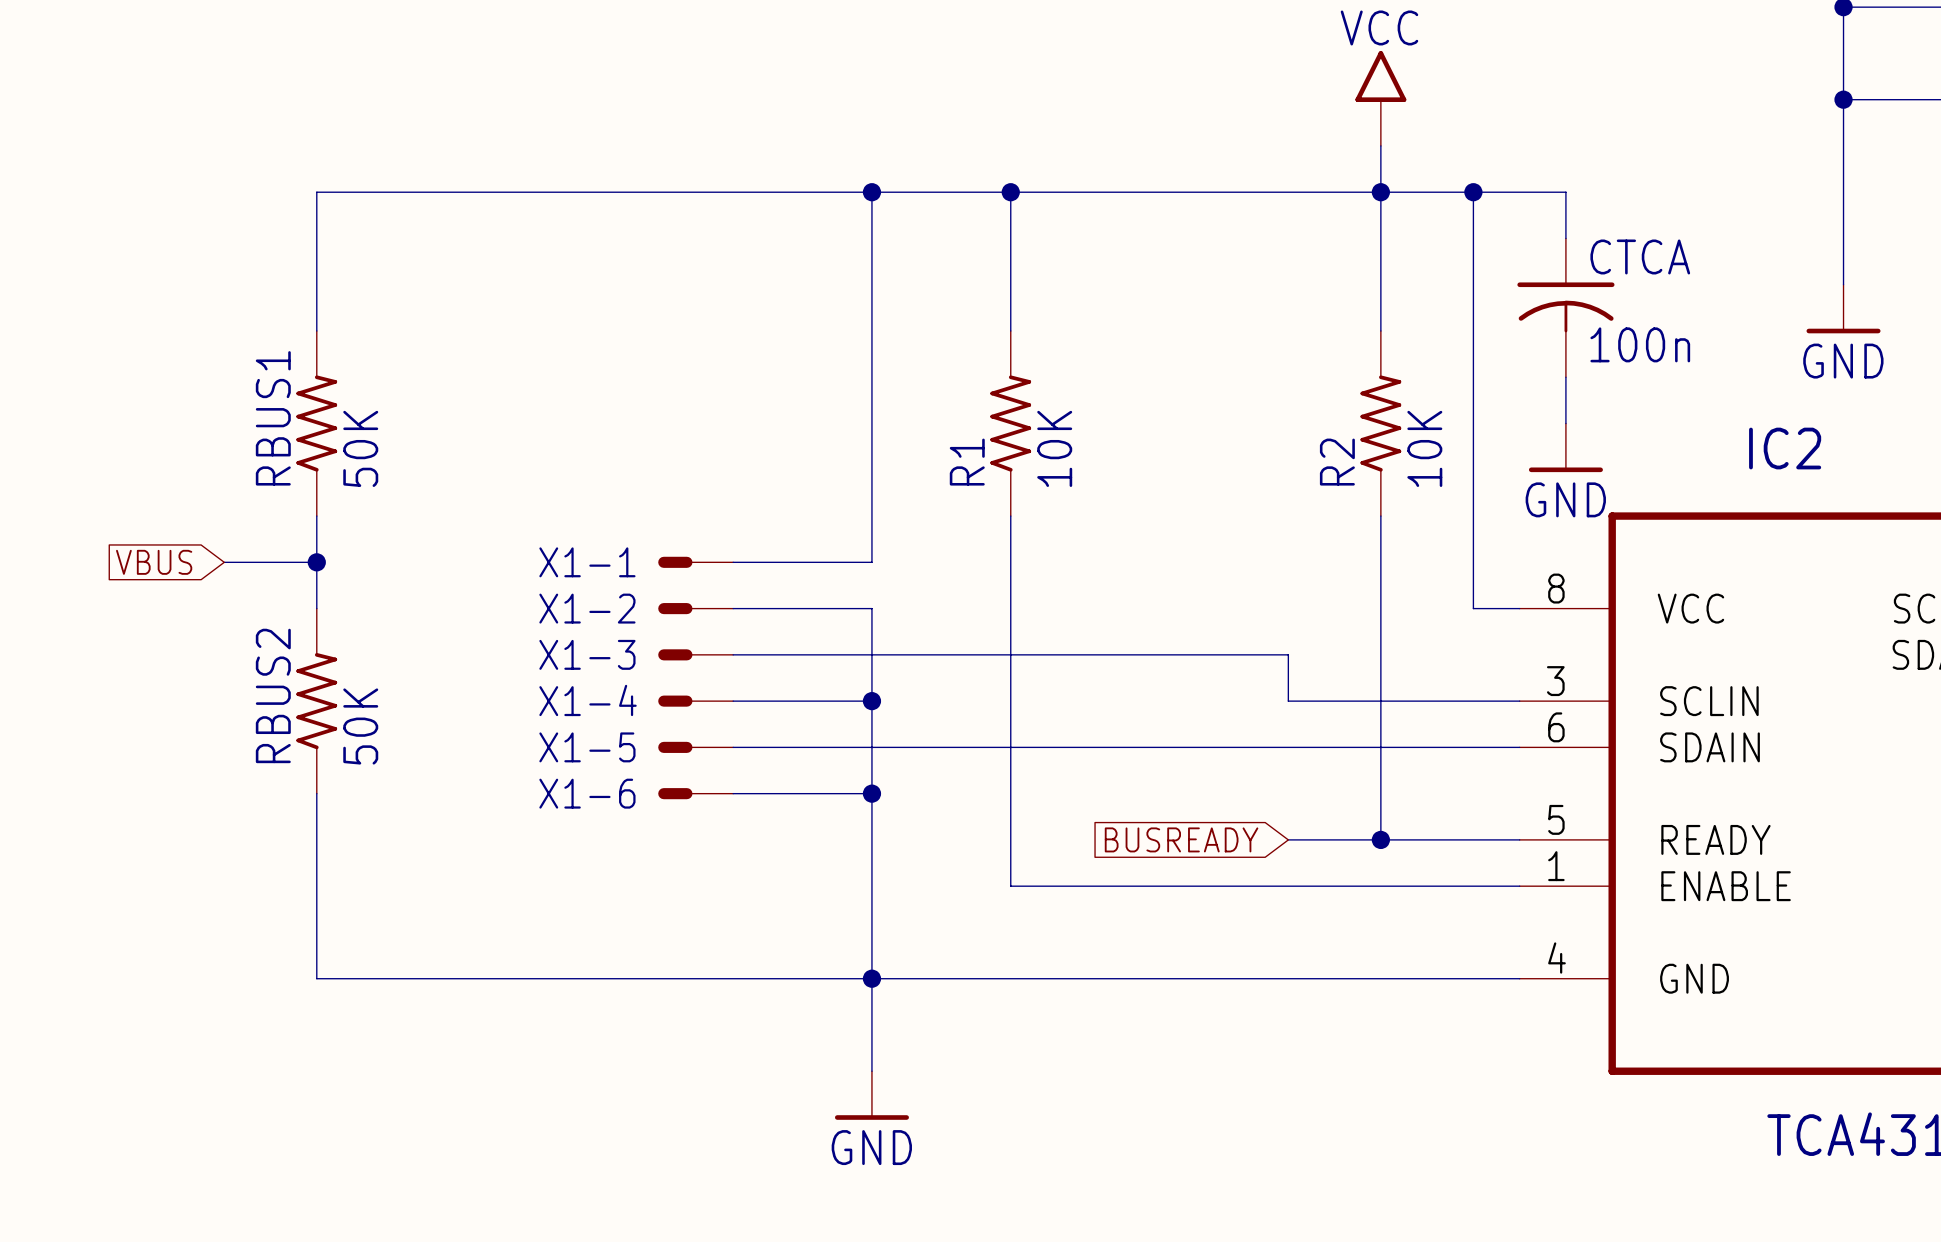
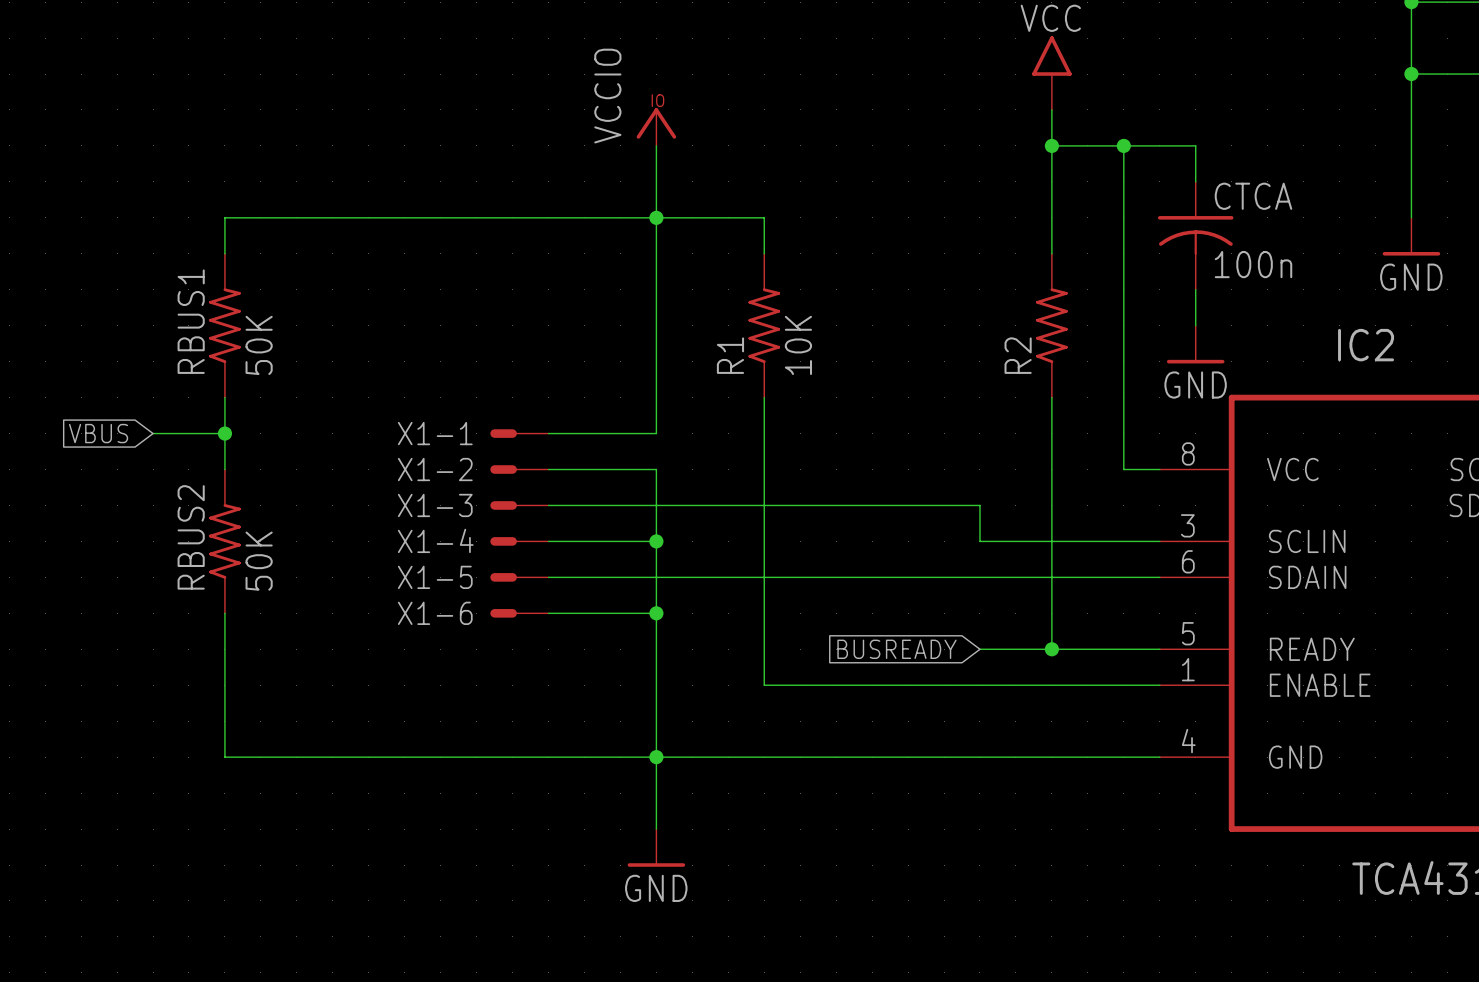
power symbol: none -> VCCIO (656, 127)
junction: (871, 192) -> none
wire: (1010, 192) (1010, 284) -> none
junction: (1010, 192) -> none
wire: (1380, 192) (316, 192) (316, 284) -> (764, 217) (224, 217)
junction: none -> (656, 217)
R2 value: 10K (1424, 448) -> none

